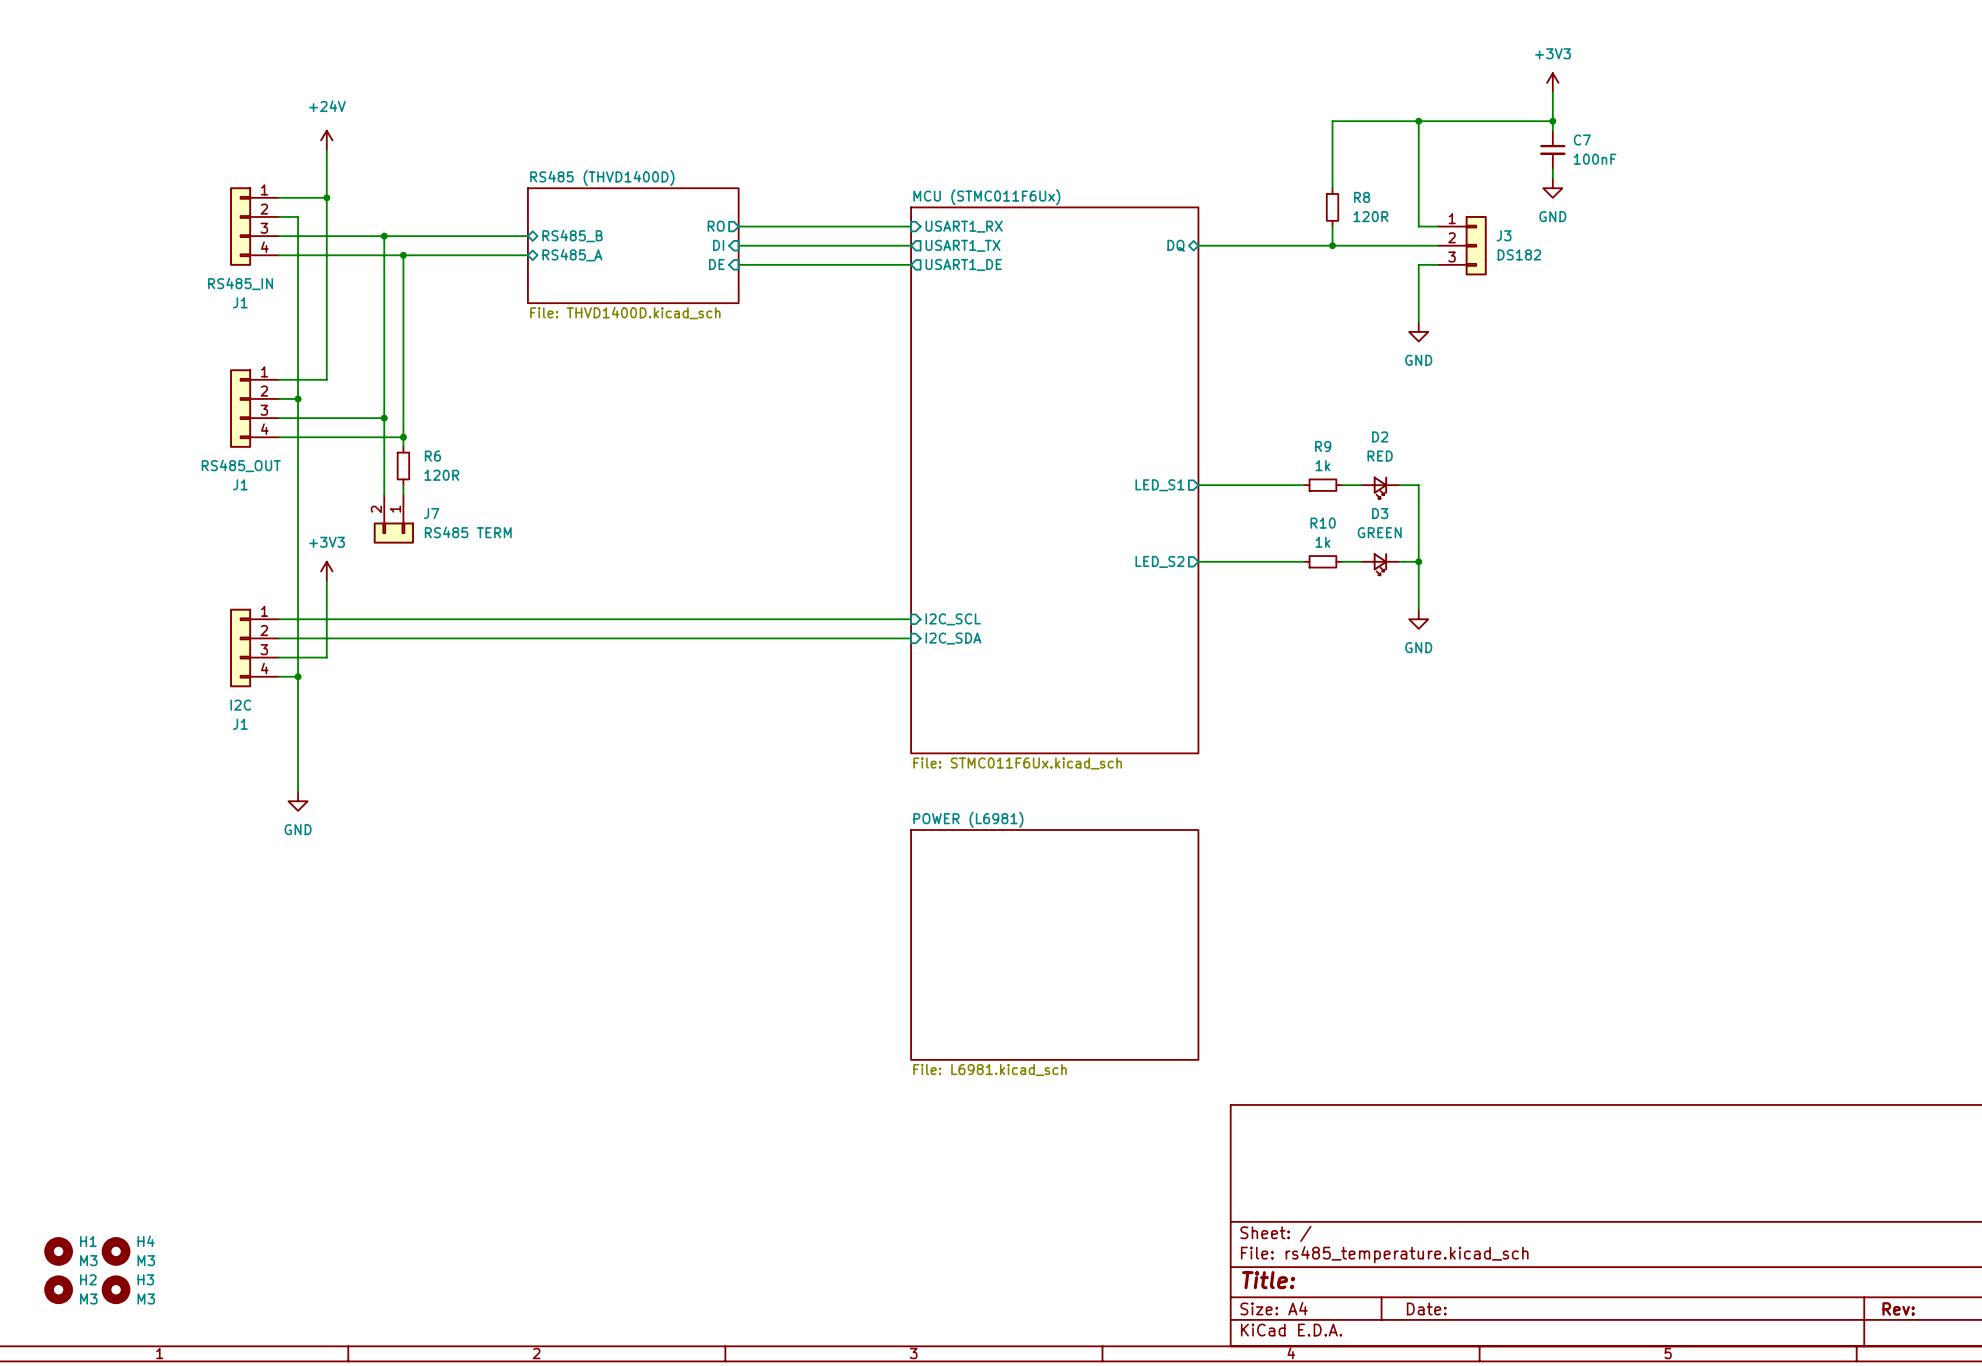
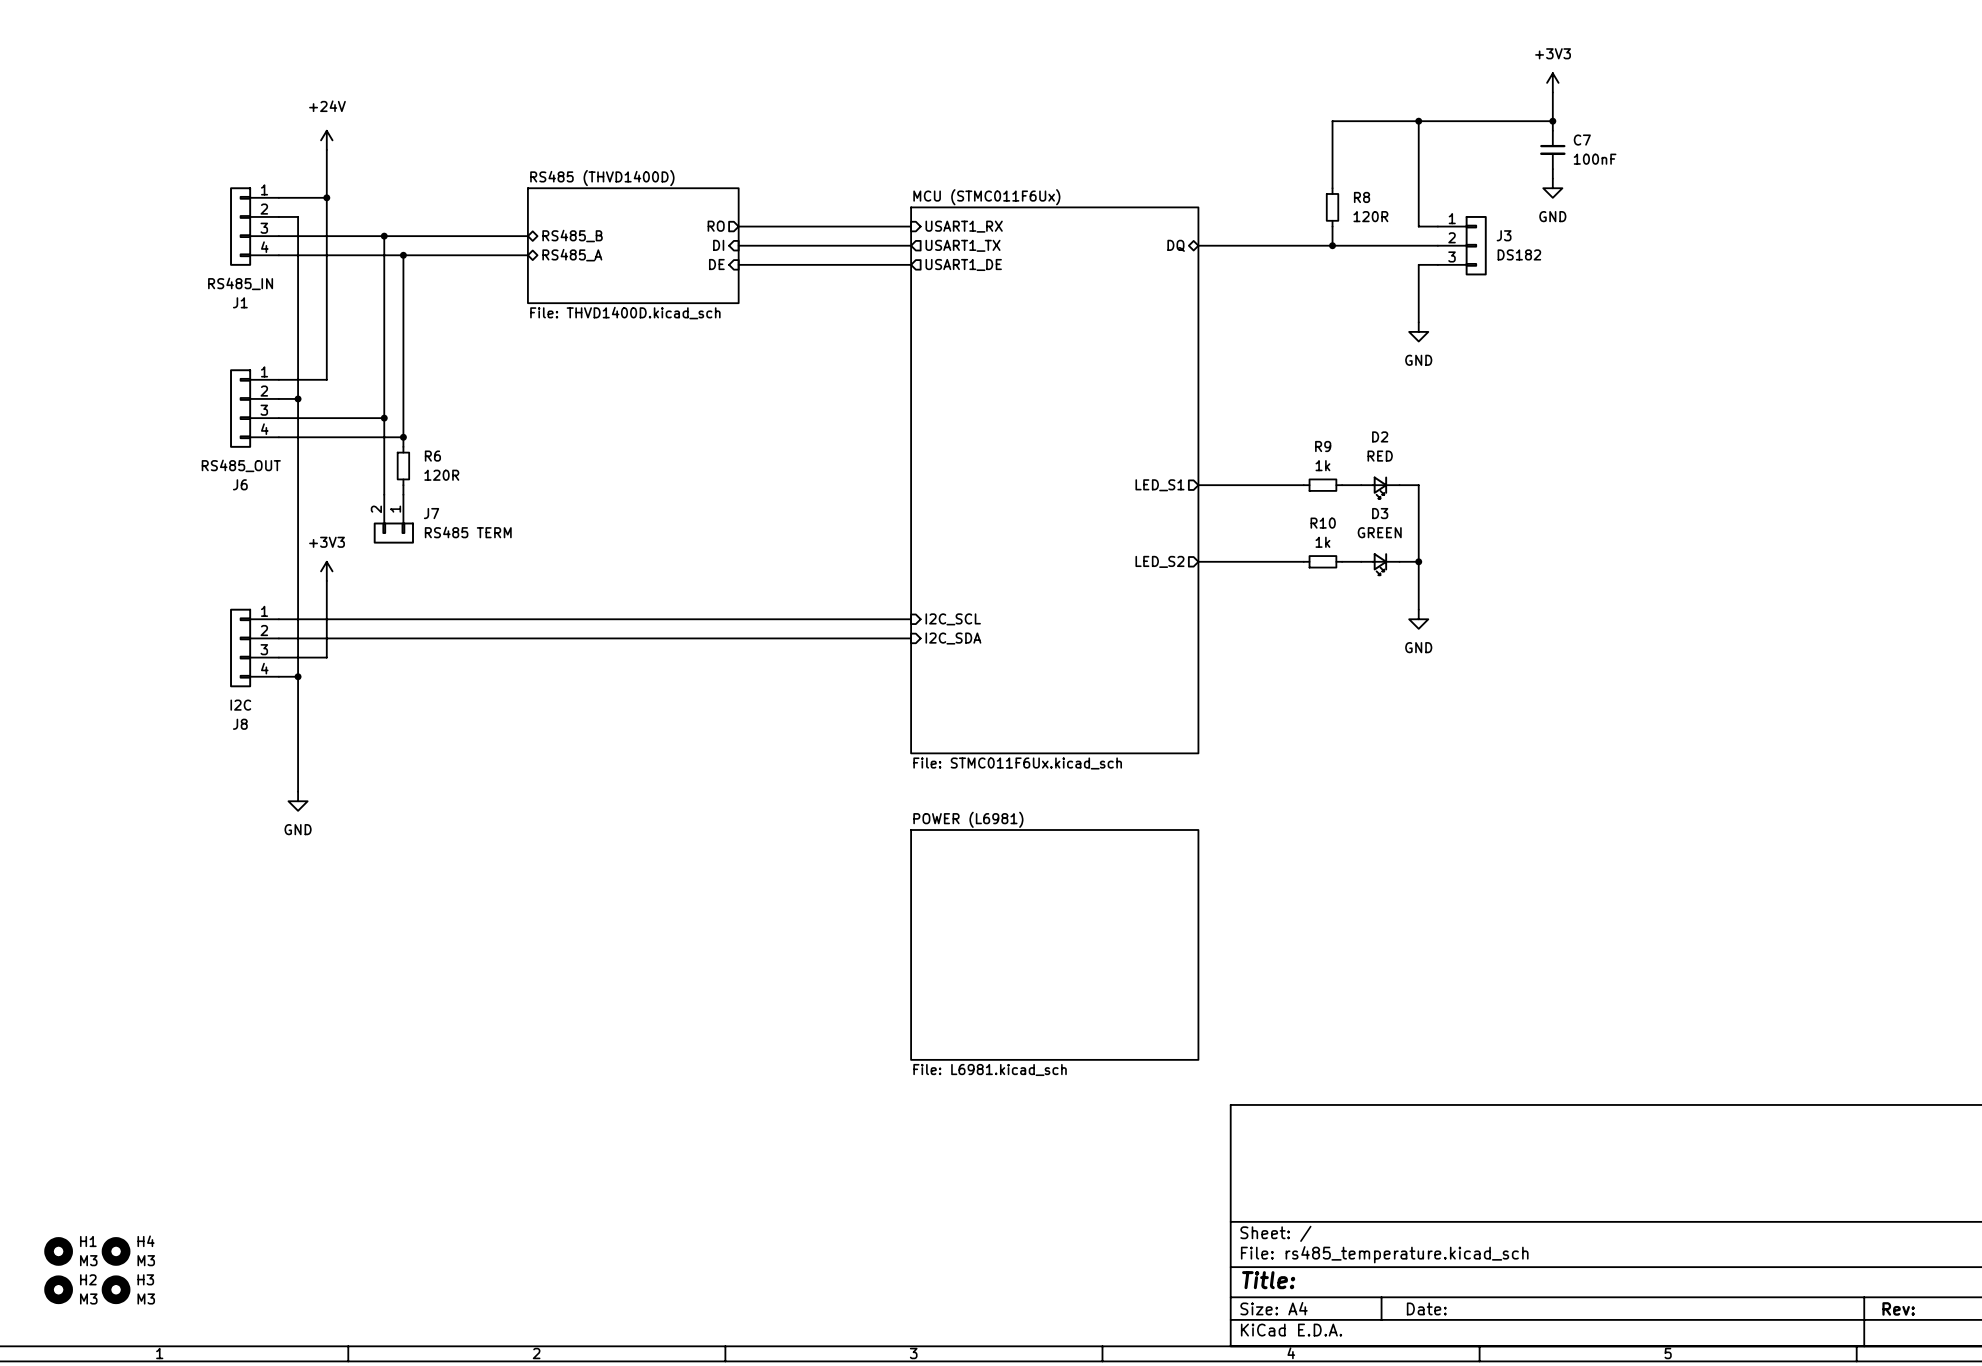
J1 name: J1 (240, 484) -> J6 (240, 484)
J1 name: J1 (240, 724) -> J8 (240, 724)

